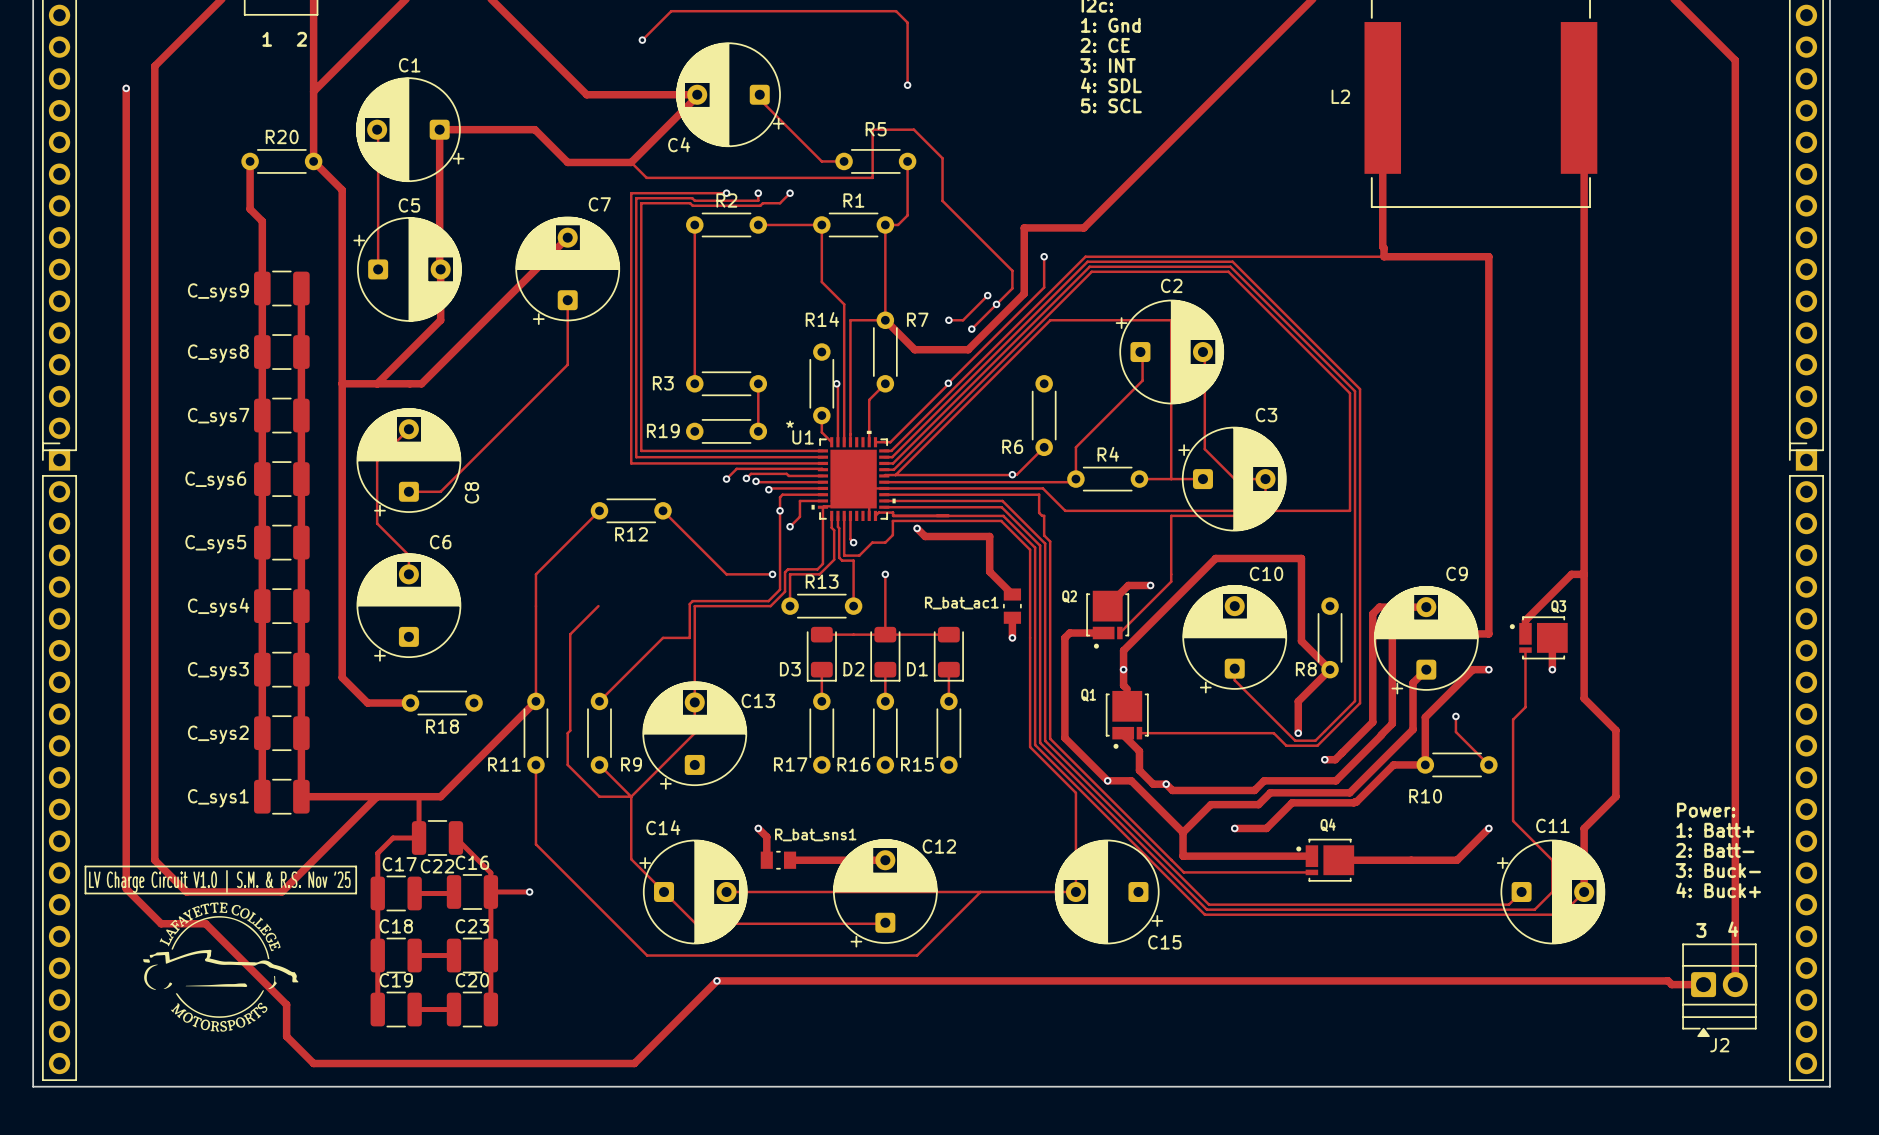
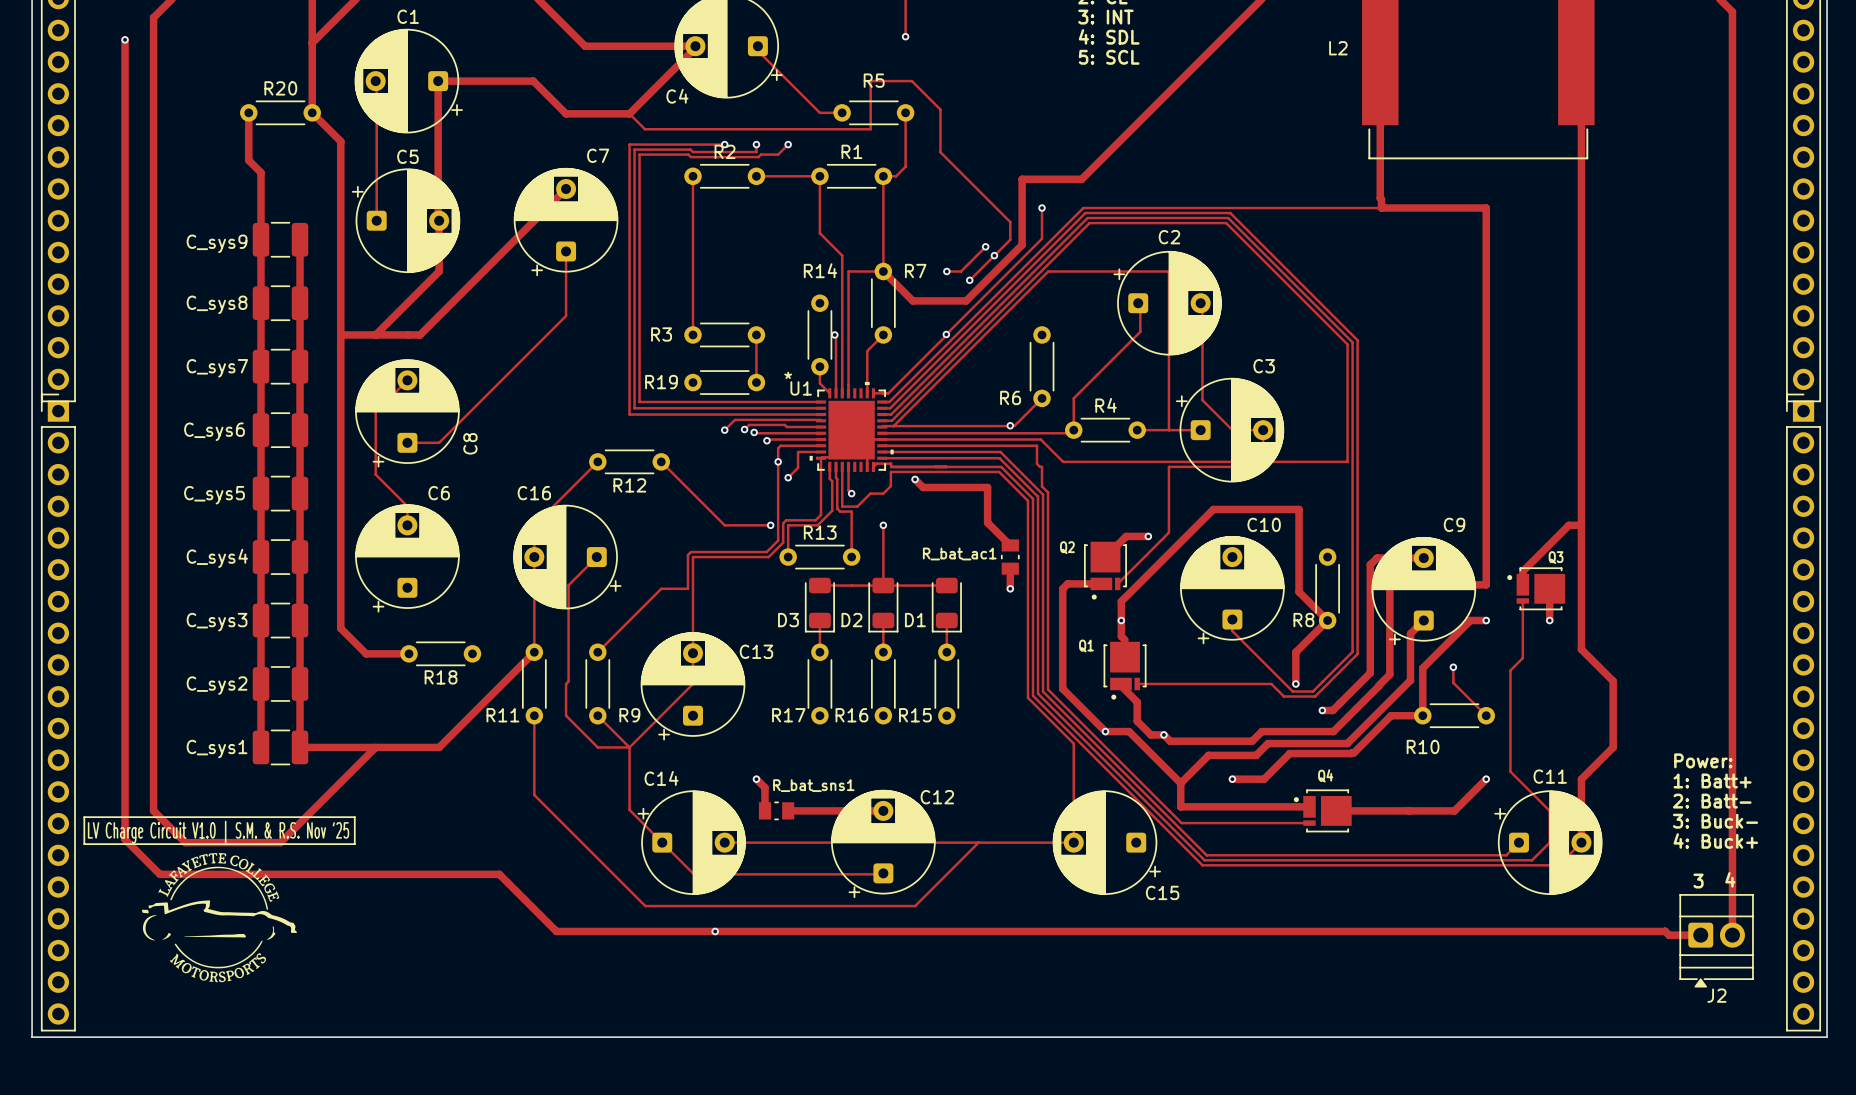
track: (418, 796) (419, 838) (393, 838) (377, 853) (377, 1009) -> none
C22: (437, 838) -> none
track: (455, 838) (490, 872) (490, 1009) -> none
C16 name position: C16 (472, 862) -> C16 (534, 493)
C16 footprint: [446, 874, 499, 910] -> [513, 504, 622, 610]
track: (453, 891) (414, 893) -> none
track: (490, 891) (529, 891) -> none
via: (529, 891) -> none
C17: (396, 893) -> none
track: (205, 923) (286, 1004) (286, 1036) (313, 1063) (634, 1063) (717, 980) -> (204, 874) (499, 874) (556, 931) (715, 931)
C18: (396, 955) -> none
track: (414, 955) (453, 955) -> none
C23: (472, 955) -> none
C19: (396, 1009) -> none
track: (414, 1009) (453, 1009) -> none
C20: (472, 1009) -> none

